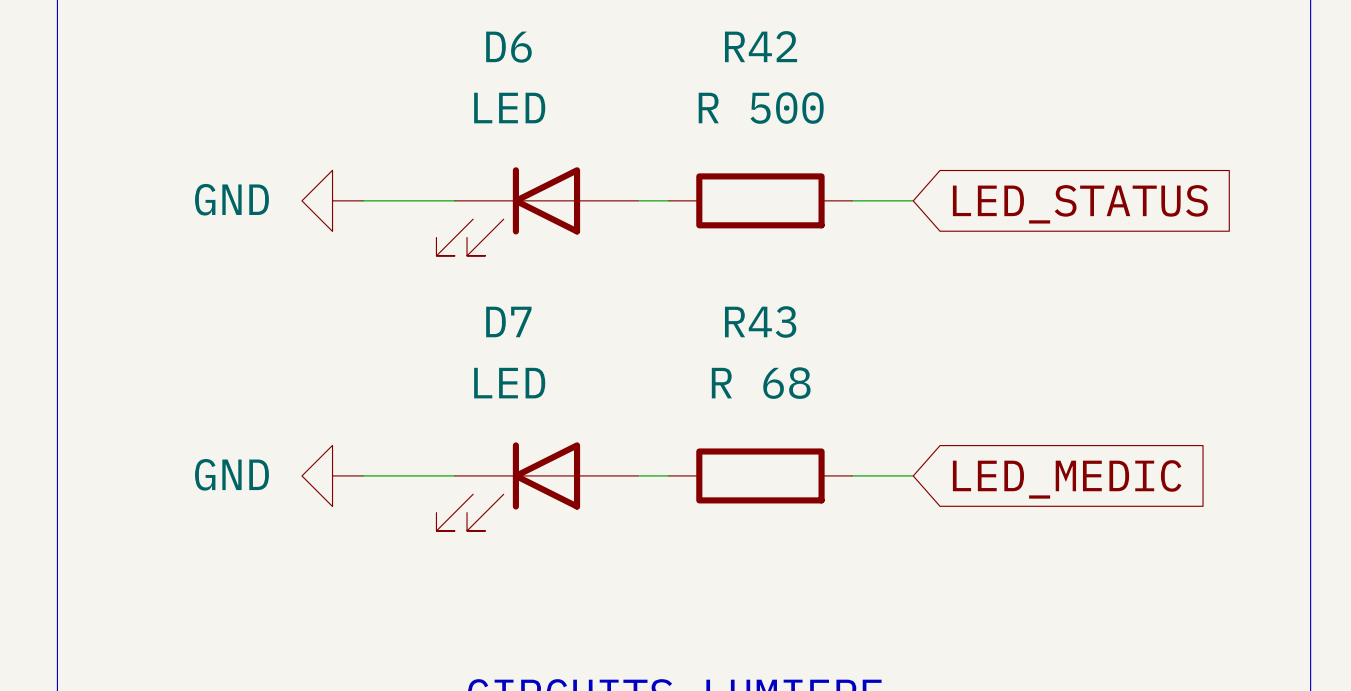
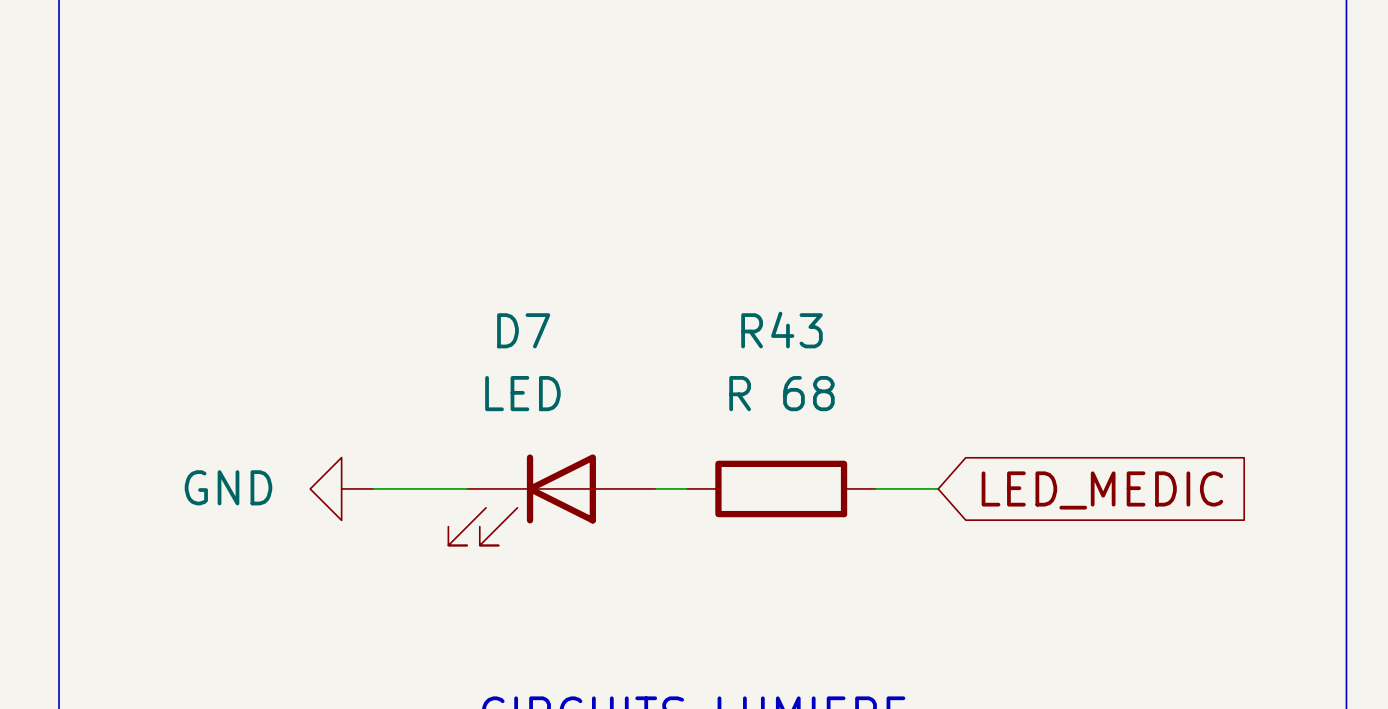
power symbol: GND (332, 200) -> none
wire: (363, 200) (454, 200) -> none
wire: (638, 200) (668, 200) -> none
R42: R 500 (760, 200) -> none
wire: (852, 200) (913, 200) -> none
global label: LED_STATUS (1080, 204) -> none
D6: LED (537, 211) -> none

